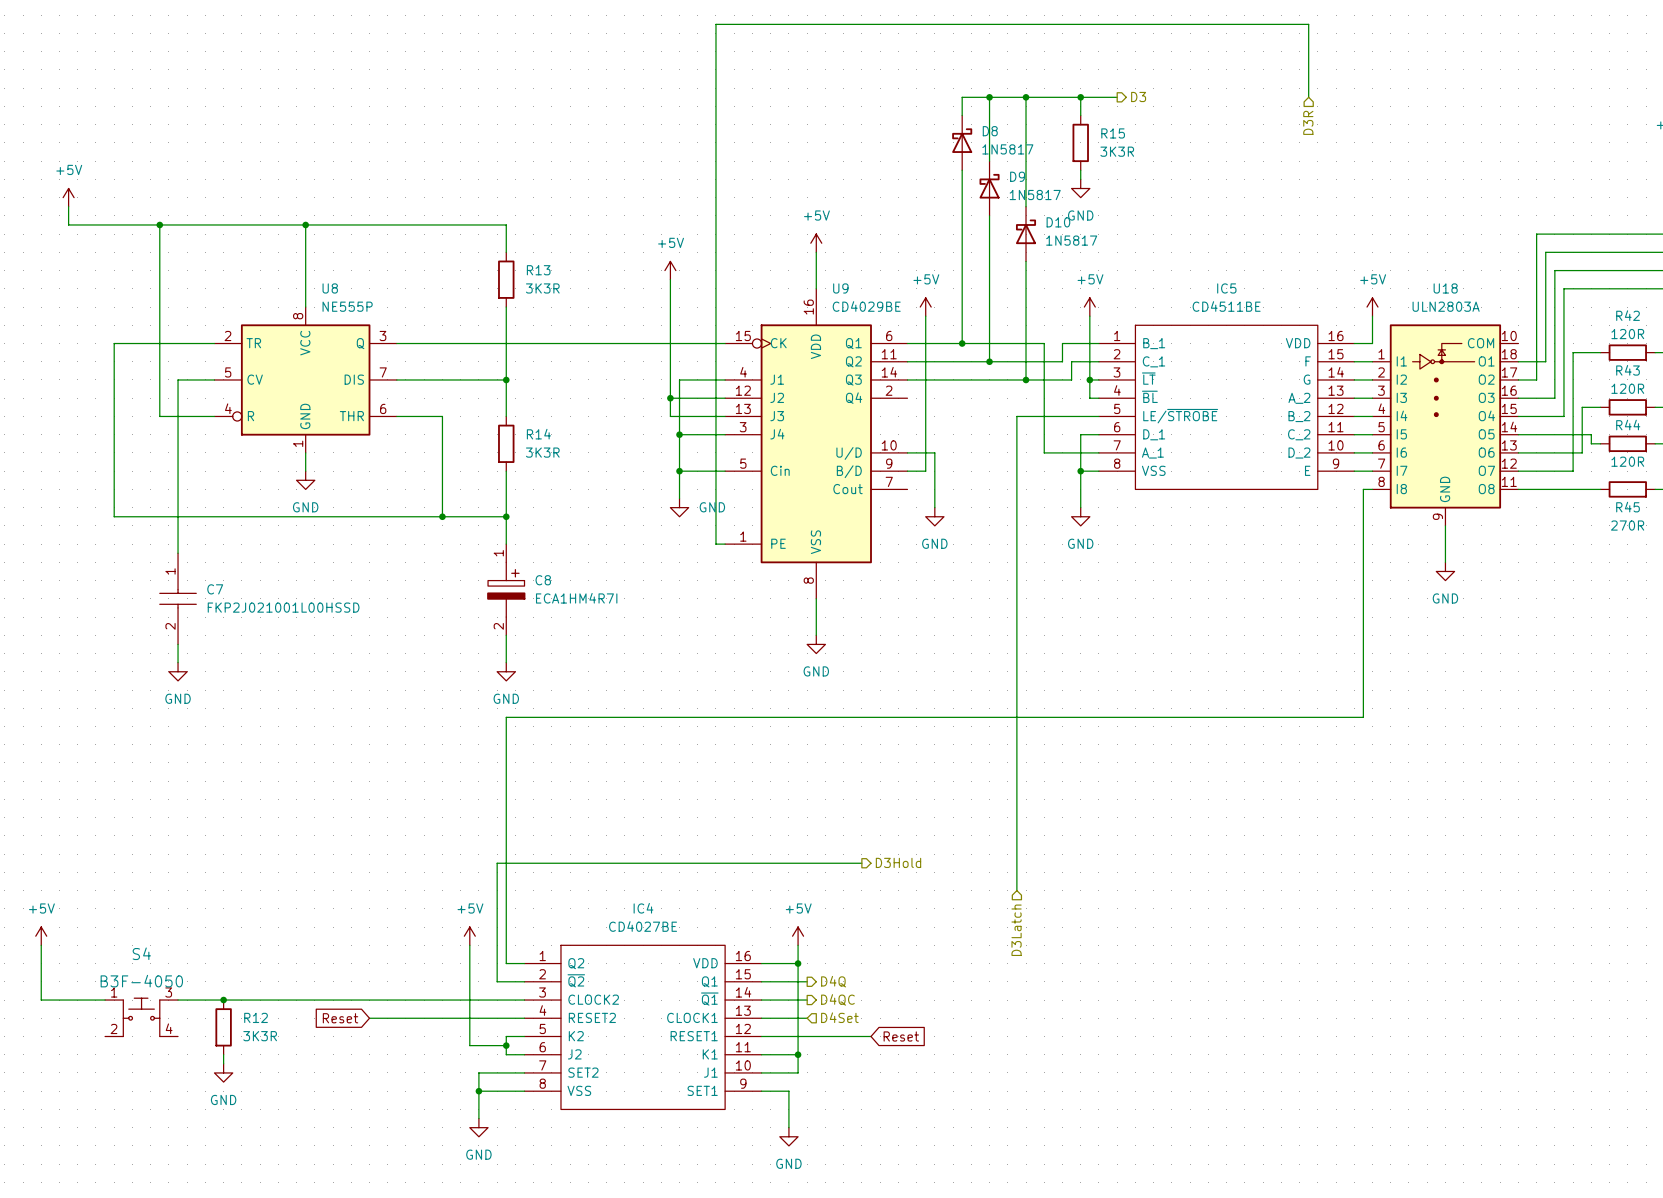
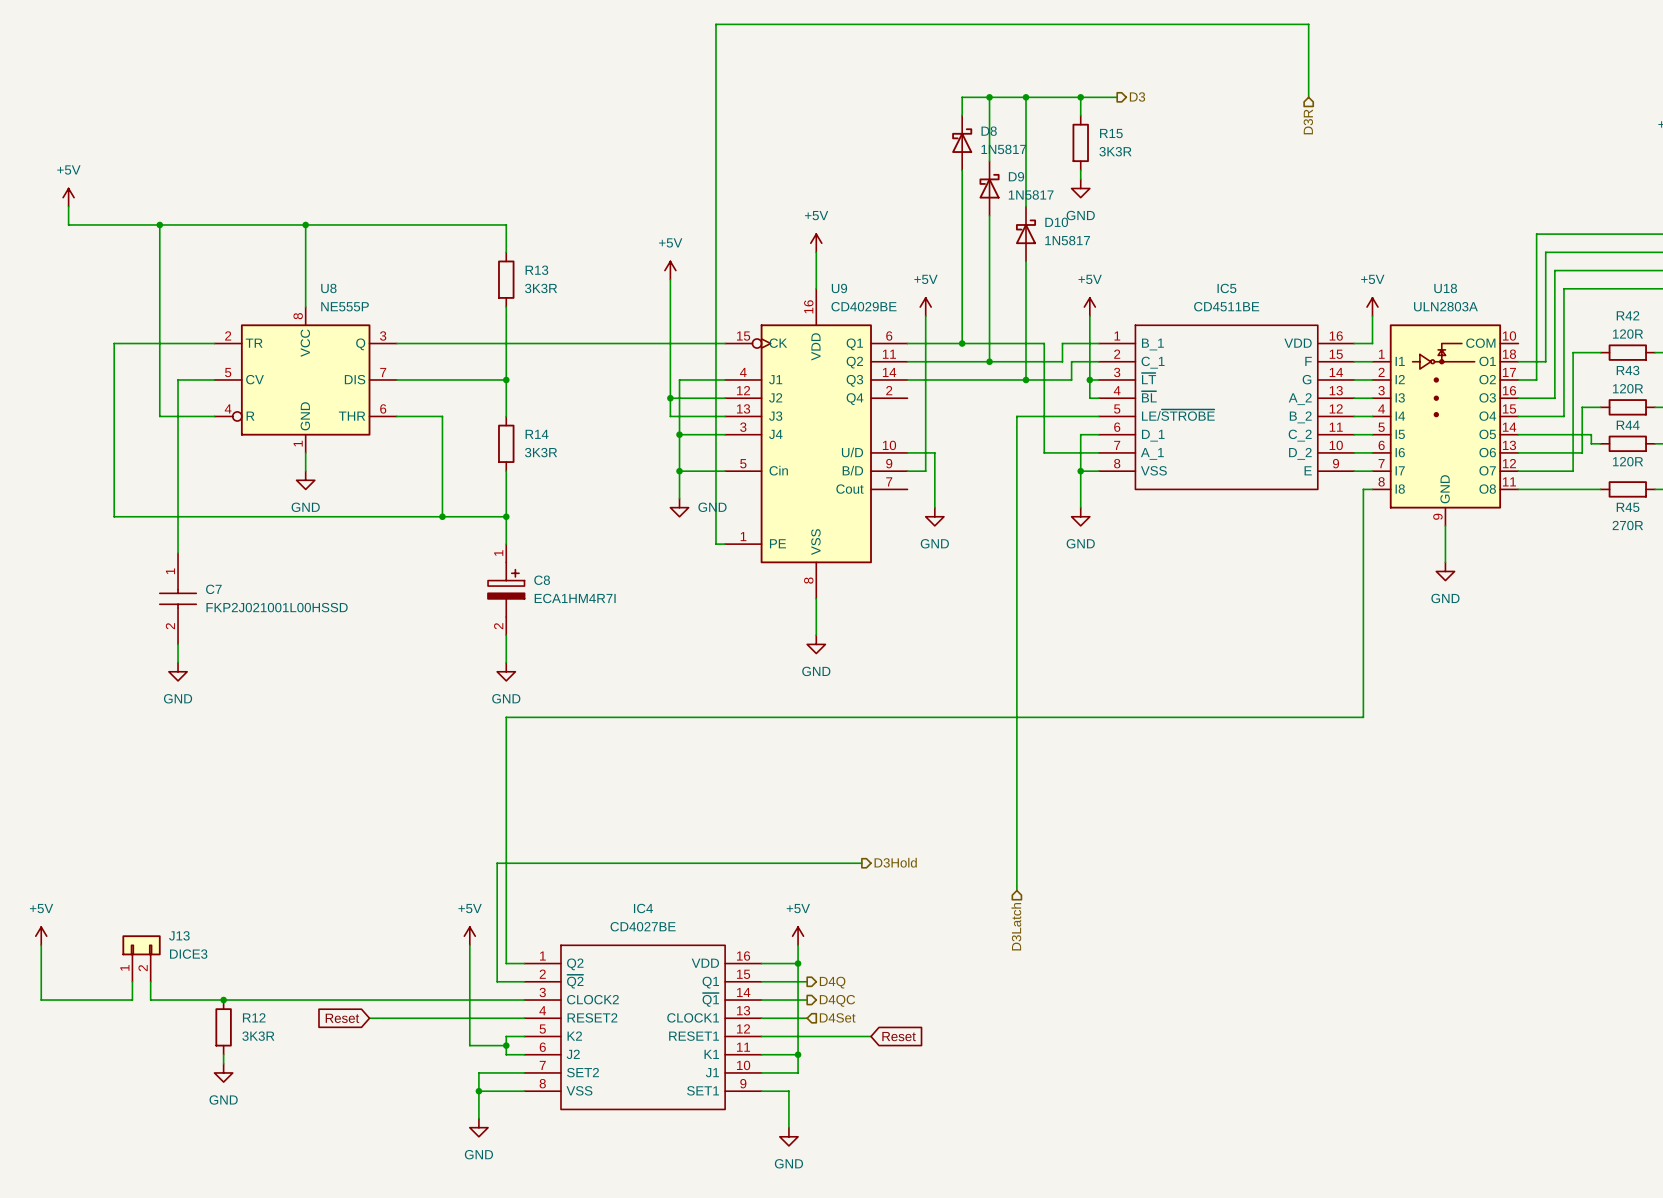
J13: none -> DICE3 (141, 958)
wire: none -> (132, 981) (132, 1000) (105, 1000)
wire: none -> (150, 981) (150, 1000) (178, 1000)
S4: B3F-4050 (141, 1017) -> none

